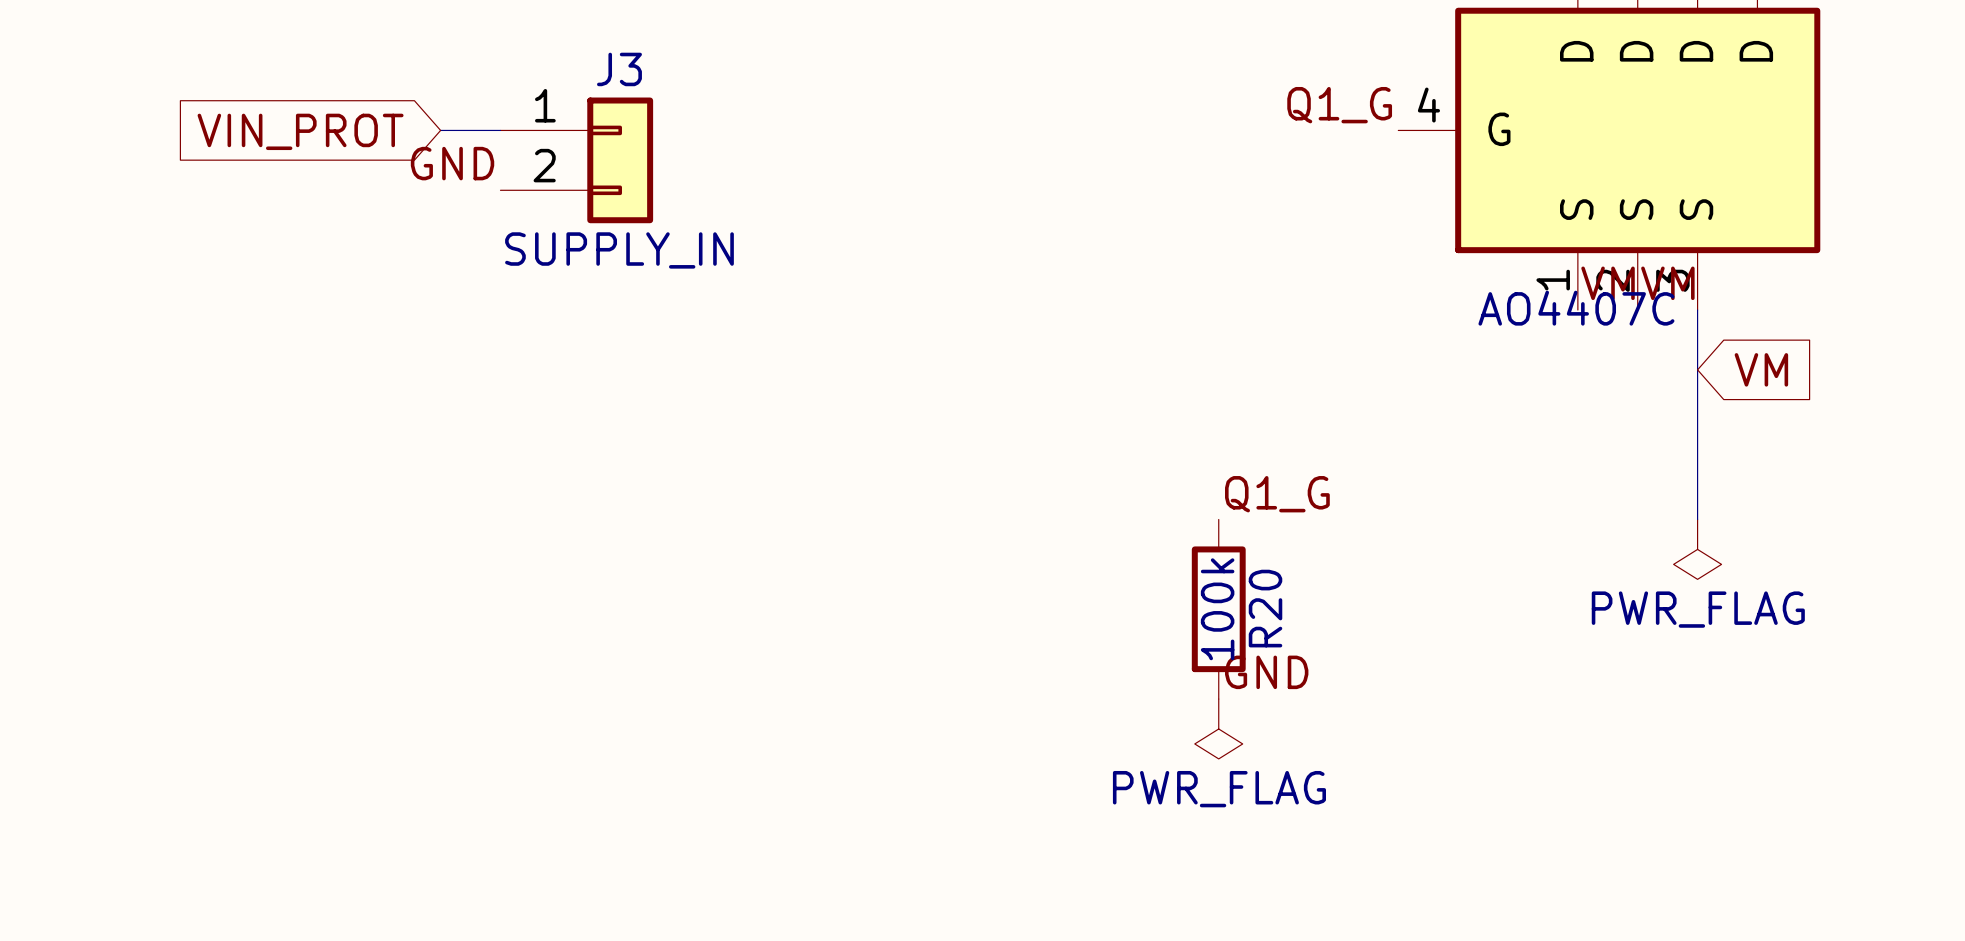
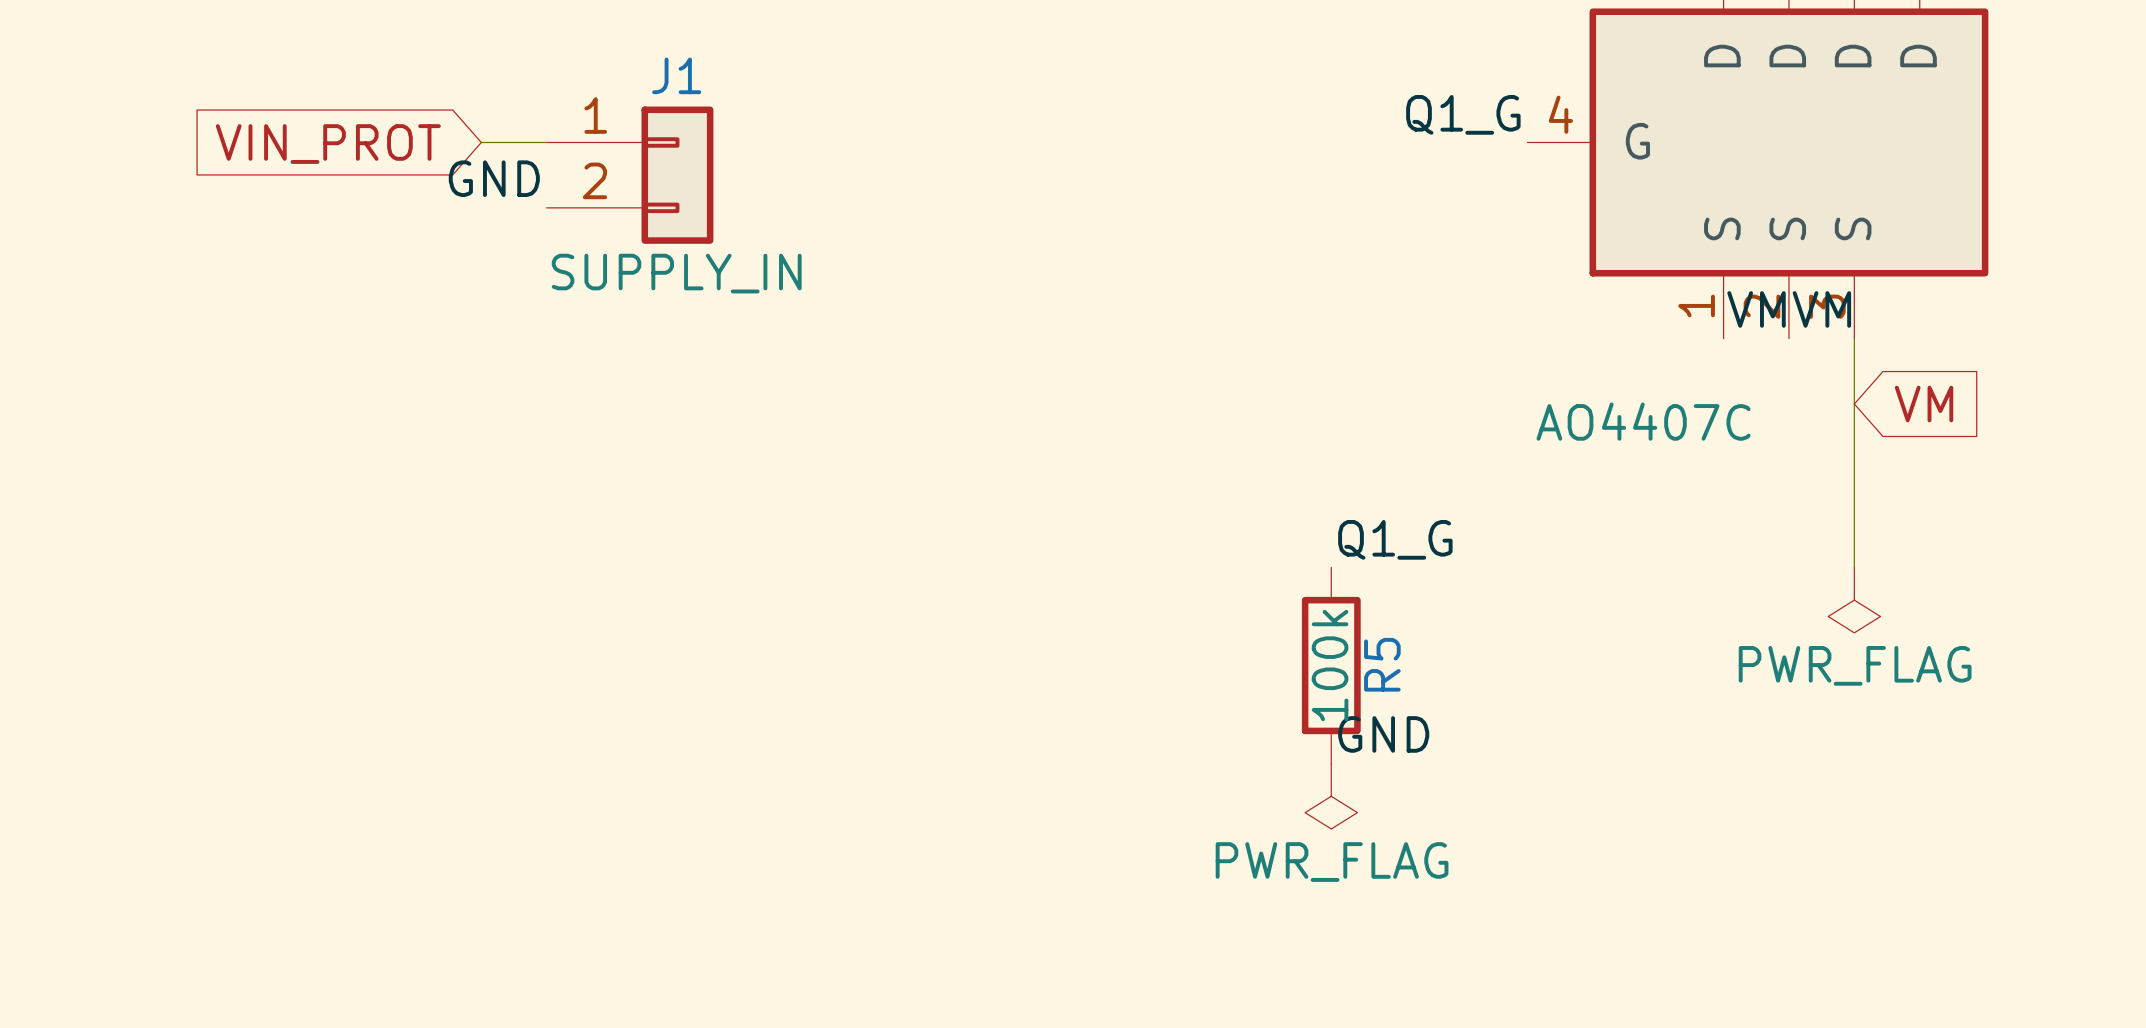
J3 name: J3 (619, 69) -> J1 (676, 75)
part value position: AO4407C (1576, 308) -> AO4407C (1643, 421)
R20 name: R20 (1265, 608) -> R5 (1382, 664)

